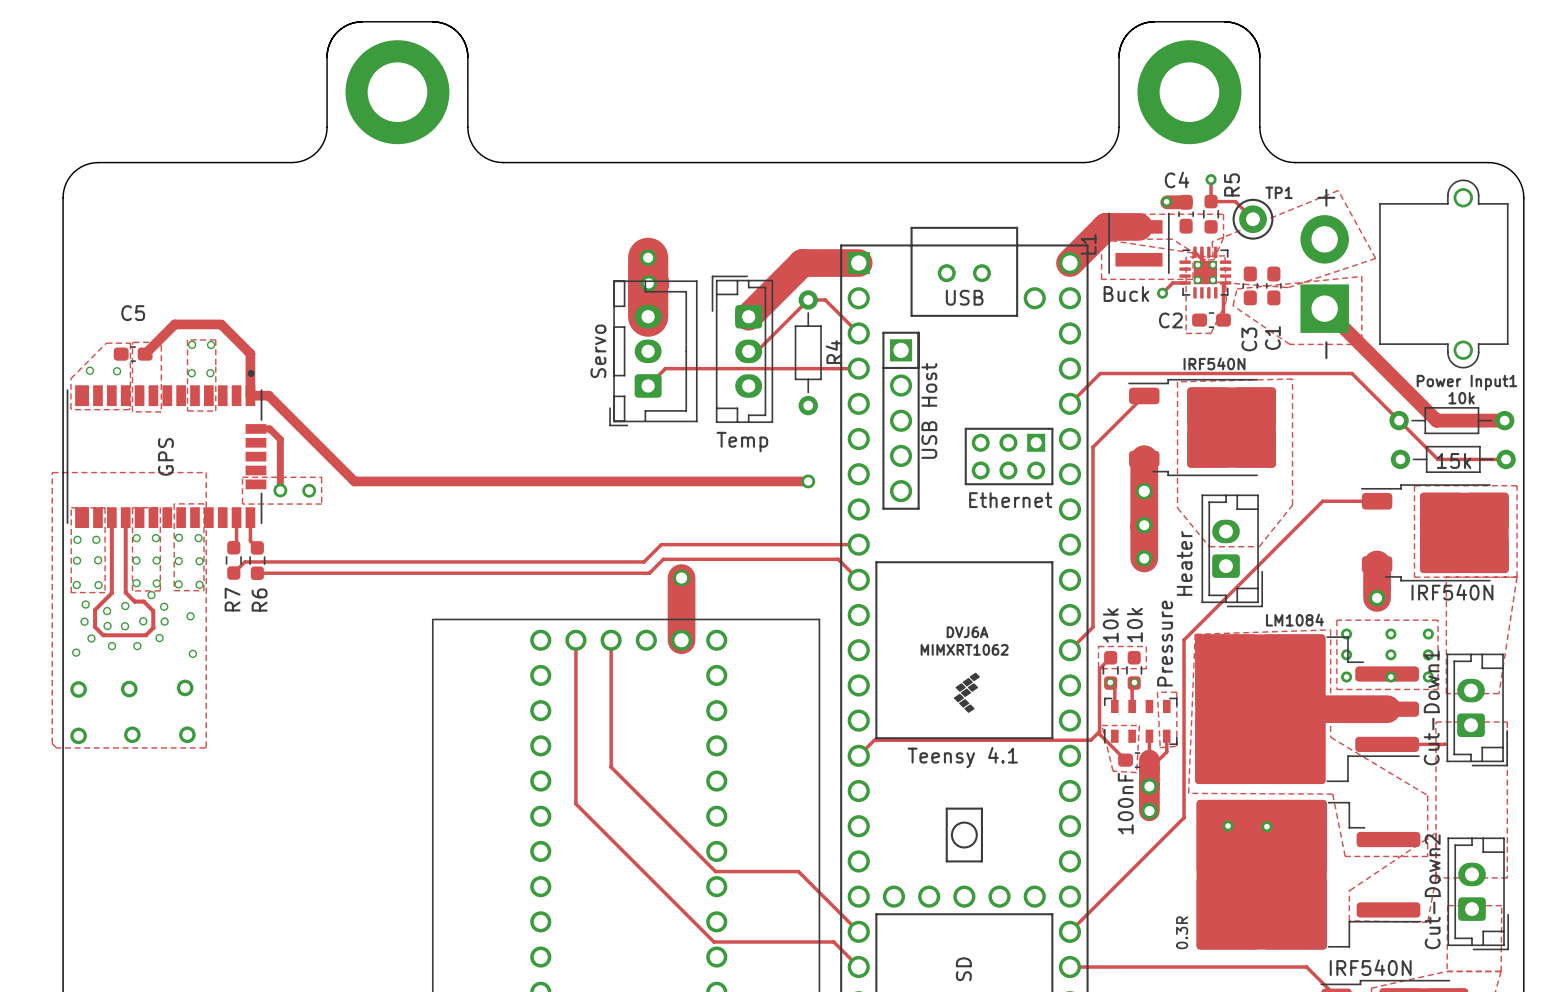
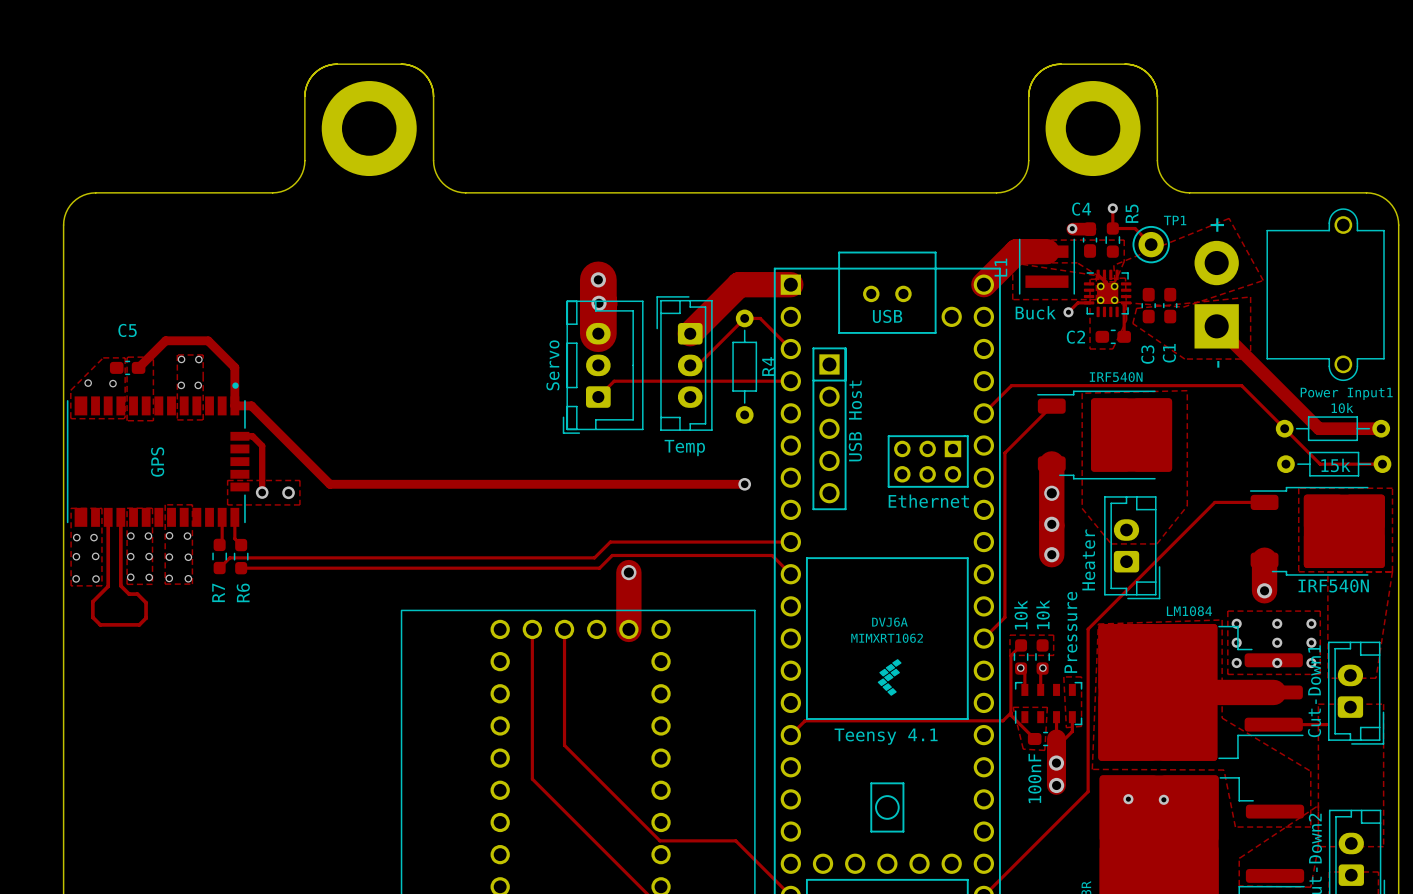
zone outline: (52, 472) (52, 743) (56, 747) (205, 747) (206, 472) (52, 472) -> none
via: (151, 595) -> none
via: (85, 604) -> none
via: (125, 606) -> none
via: (164, 606) -> none
via: (107, 611) -> none
via: (190, 616) -> none
via: (84, 621) -> none
via: (143, 621) -> none
via: (164, 621) -> none
via: (107, 625) -> none
via: (125, 626) -> none
via: (91, 638) -> none
via: (159, 638) -> none
via: (111, 646) -> none
via: (137, 646) -> none
via: (76, 652) -> none
via: (192, 653) -> none
via: (185, 687) -> none
via: (78, 689) -> none
via: (129, 689) -> none
via: (132, 734) -> none
via: (187, 734) -> none
via: (78, 735) -> none

